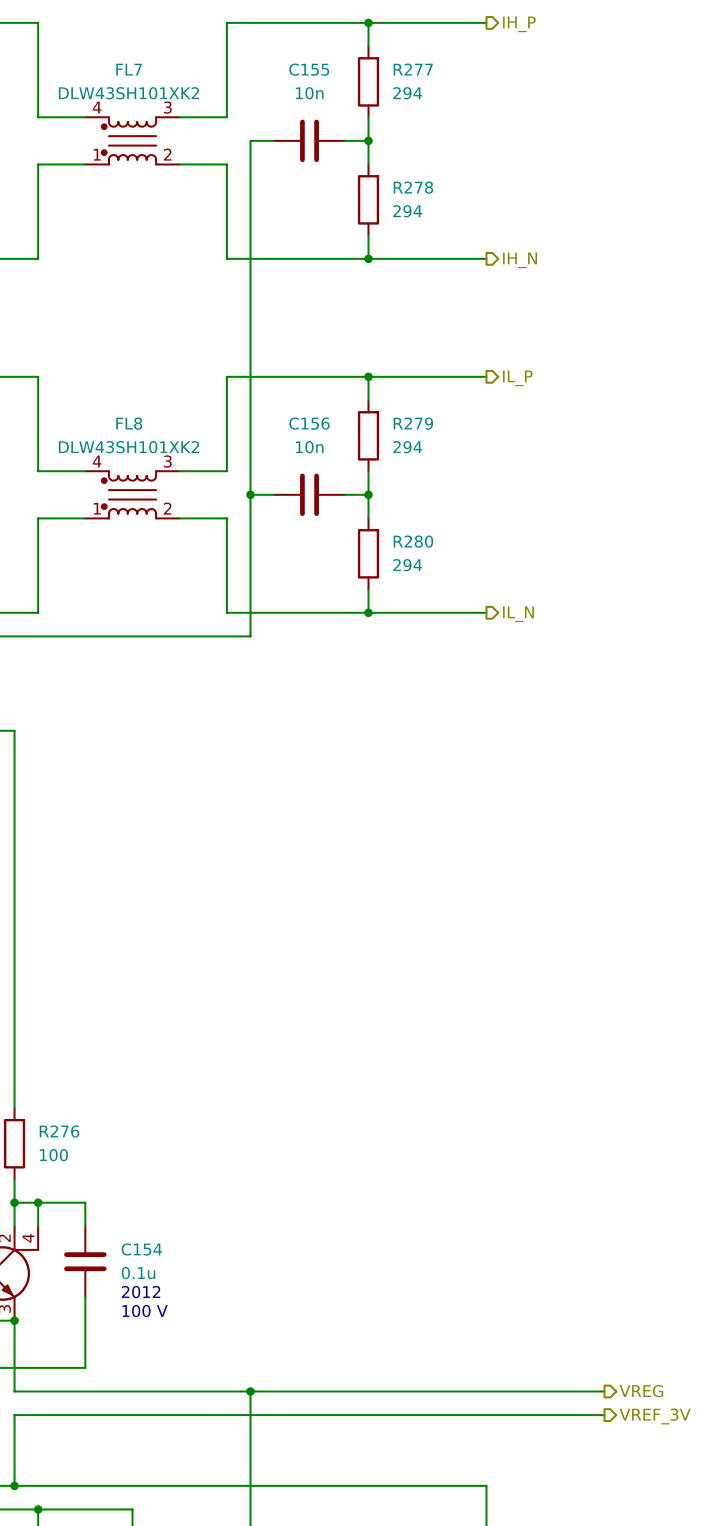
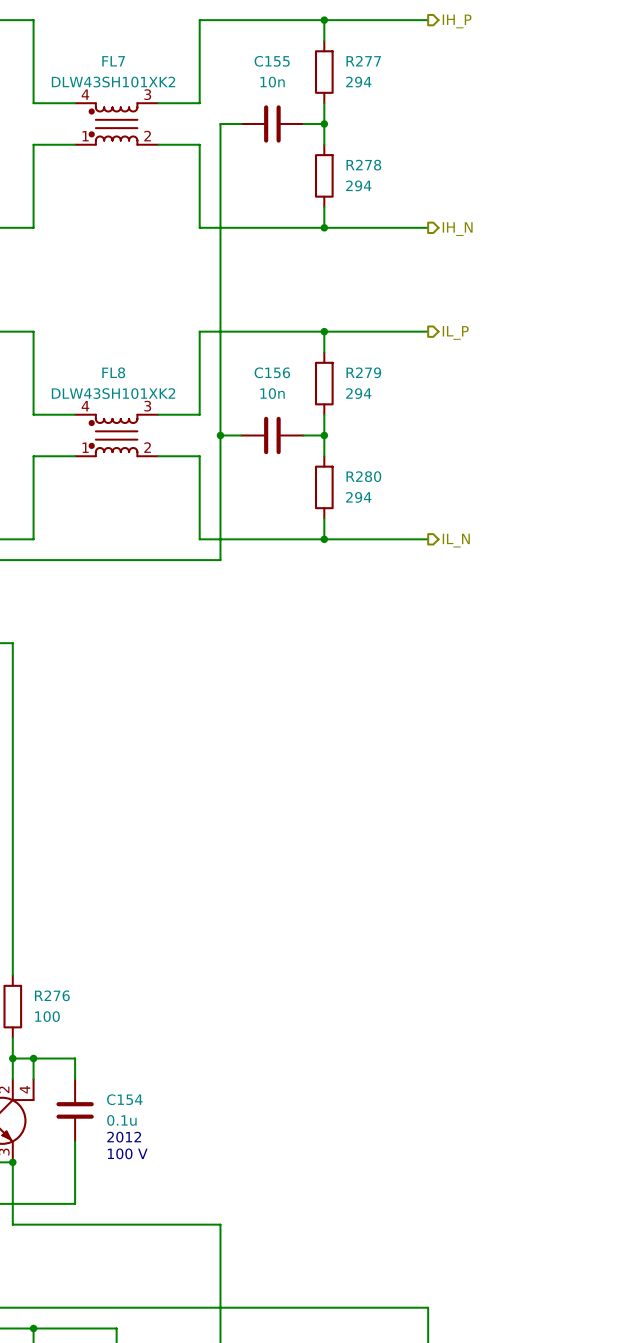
wire: (250, 1391) (604, 1391) -> none
junction: (250, 1391) -> none
hierarchical label: VREG (641, 1391) -> none
wire: (604, 1415) (14, 1415) (14, 1485) -> none
hierarchical label: VREF_3V (655, 1416) -> none
junction: (14, 1485) -> none

